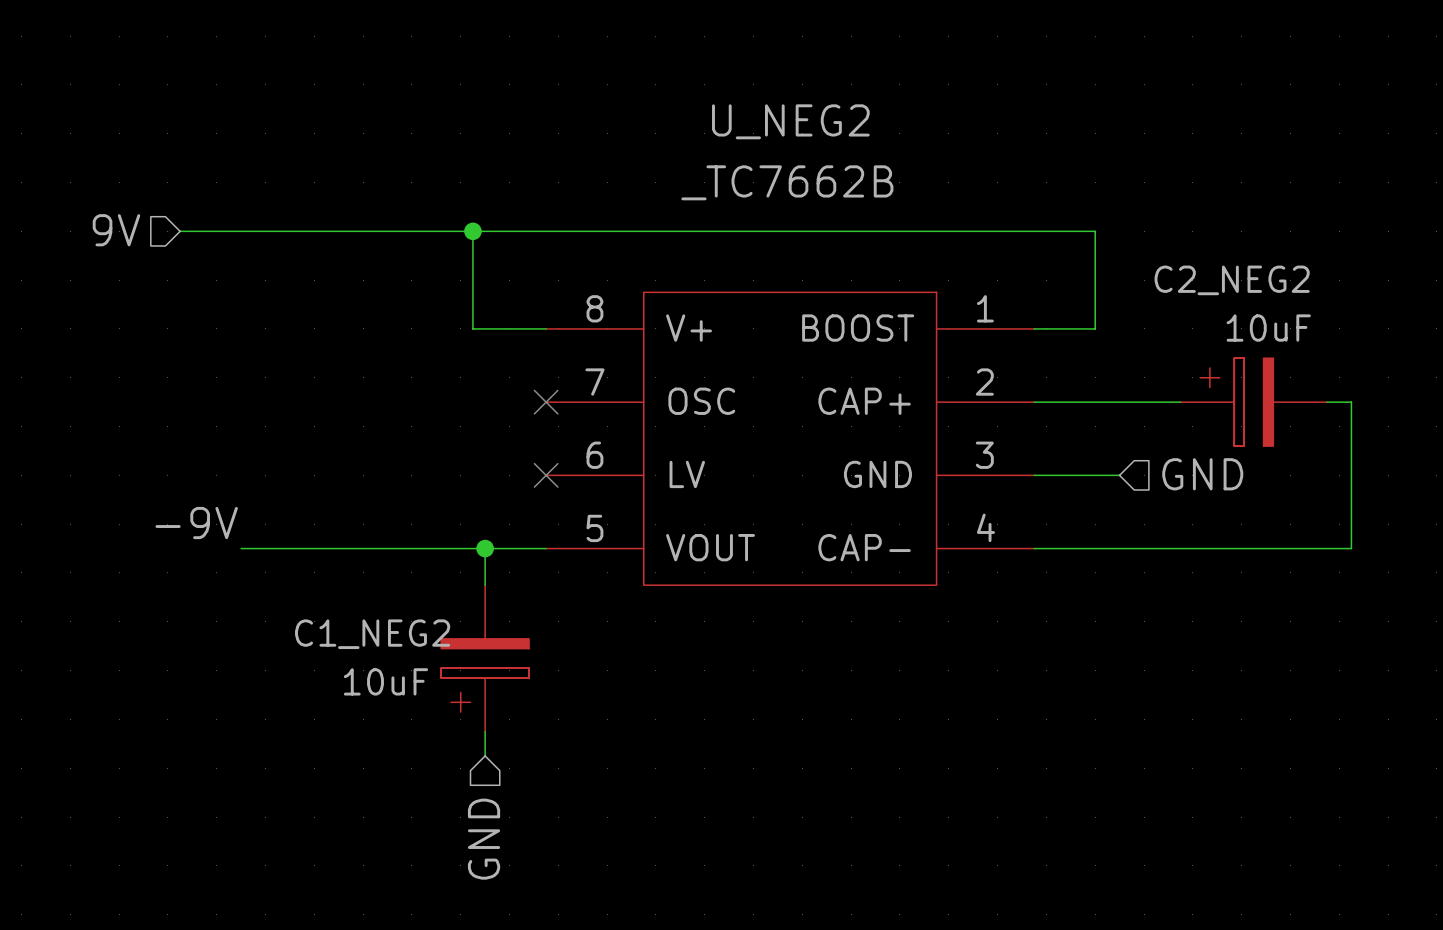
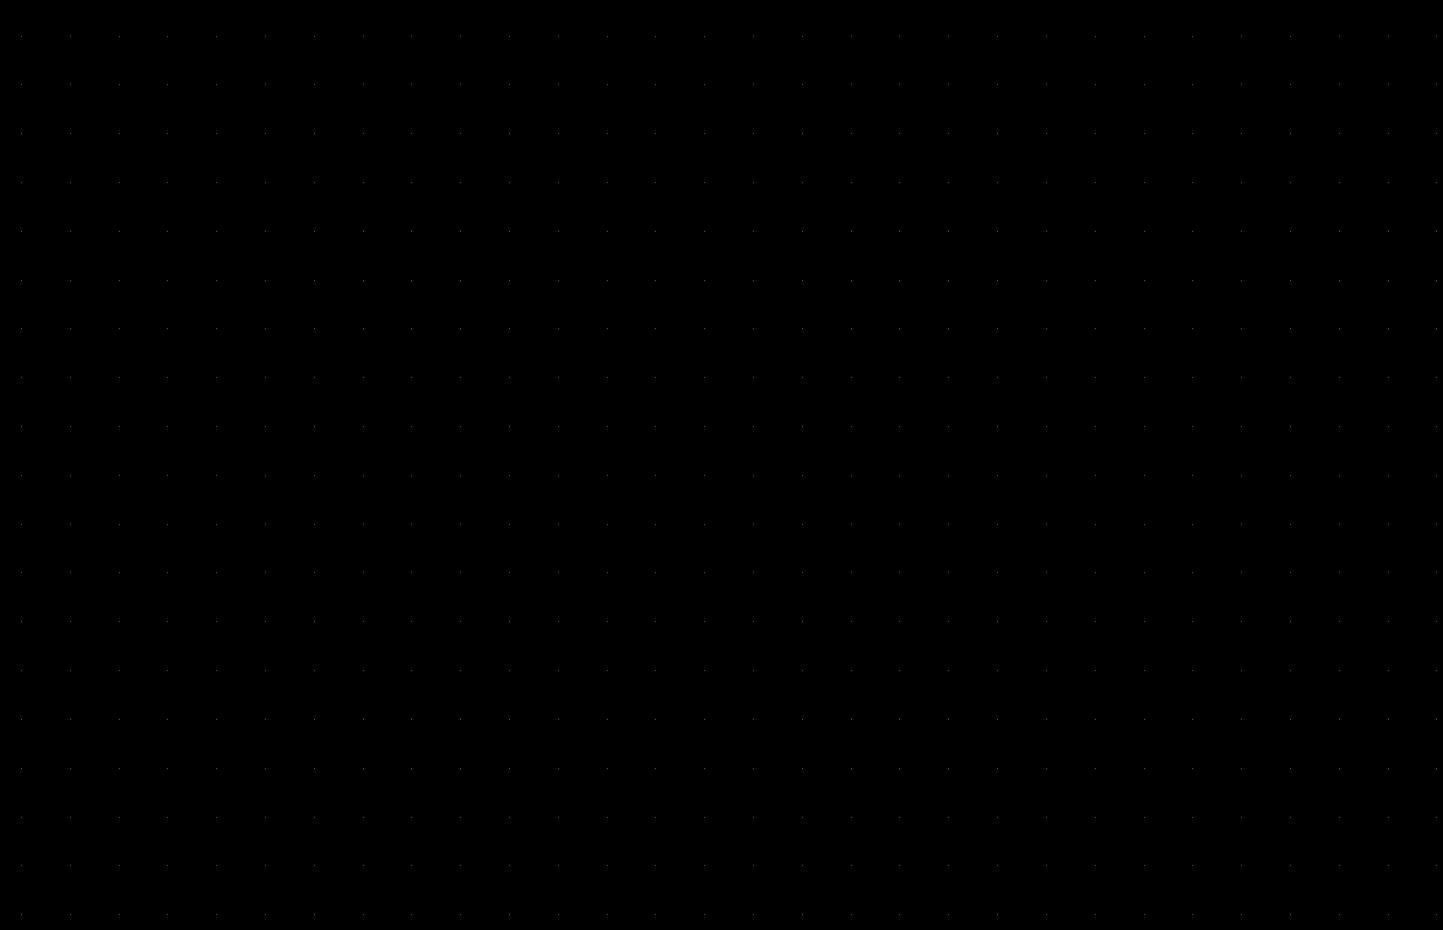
hierarchical label: 9V (116, 230) -> none
wire: (180, 231) (1095, 231) (1095, 328) (1034, 328) -> none
wire: (472, 231) (472, 328) (546, 328) -> none
junction: (472, 231) -> none
no-connect mark: (546, 402) -> none
wire: (1034, 402) (1180, 402) -> none
C2_NEG2: 10uF (1253, 402) -> none
wire: (1327, 402) (1351, 402) (1351, 548) (1034, 548) -> none
U_NEG2: _TC7662B (790, 438) -> none
hierarchical label: GND (1202, 474) -> none
no-connect mark: (546, 475) -> none
wire: (1034, 475) (1119, 475) -> none
label: -9V (196, 523) -> none
wire: (241, 548) (546, 548) -> none
wire: (485, 548) (485, 585) -> none
junction: (485, 548) -> none
C1_NEG2: 10uF (485, 658) -> none
wire: (485, 731) (485, 755) -> none
hierarchical label: GND (484, 839) -> none

